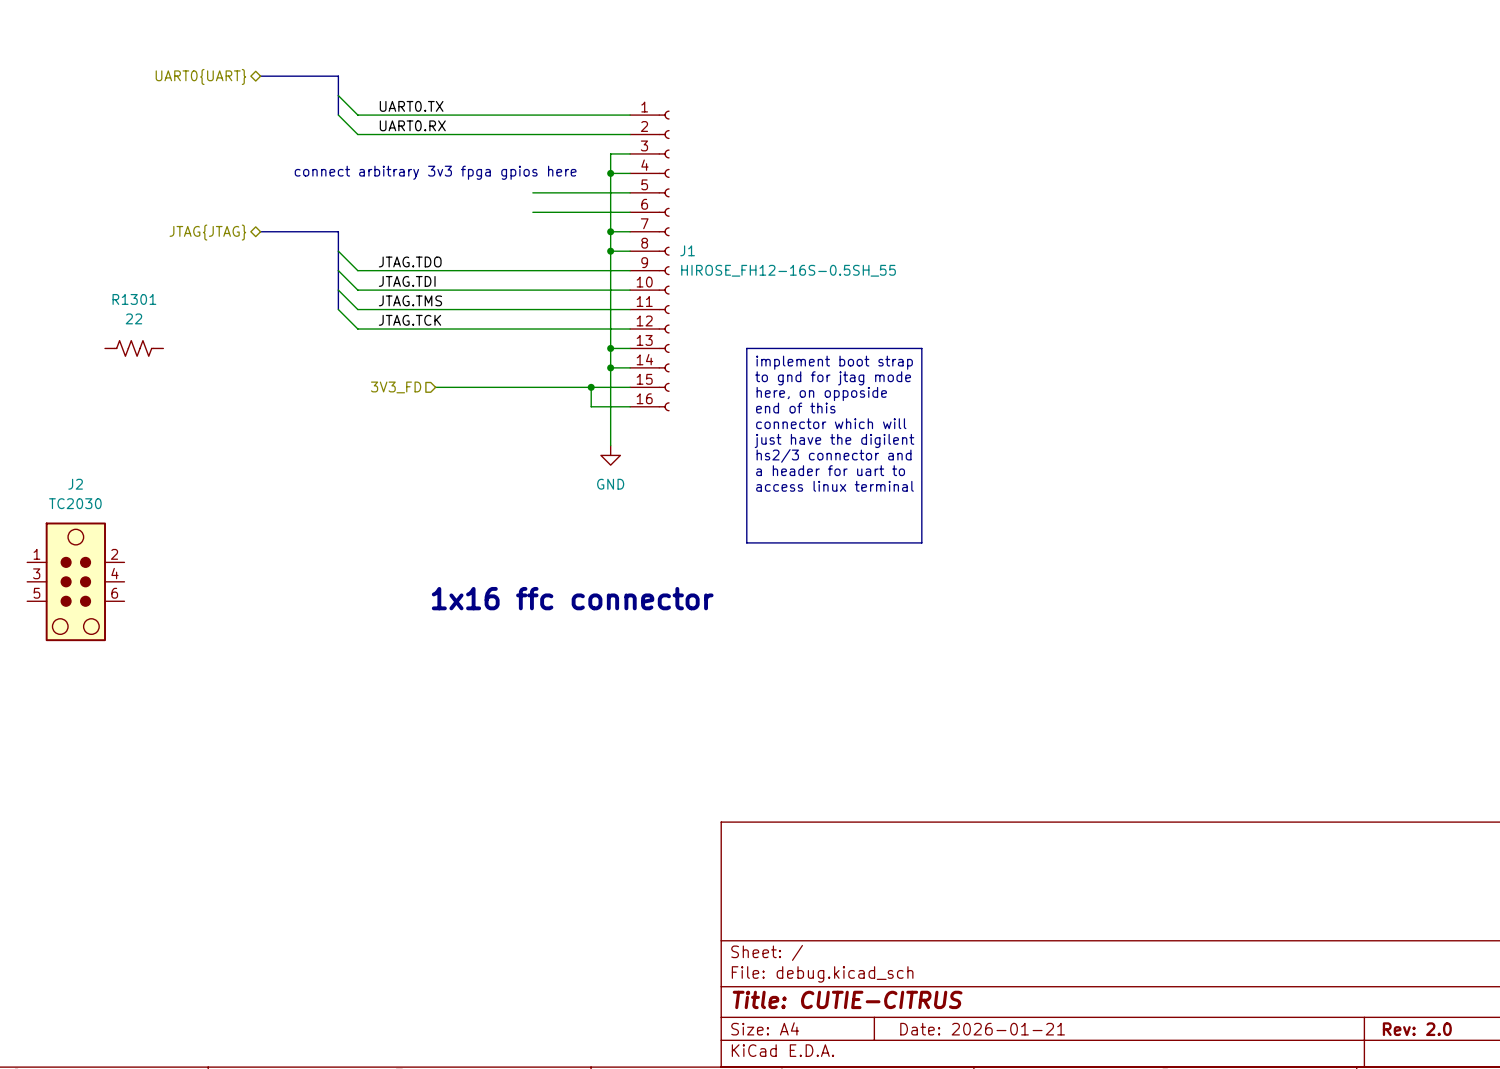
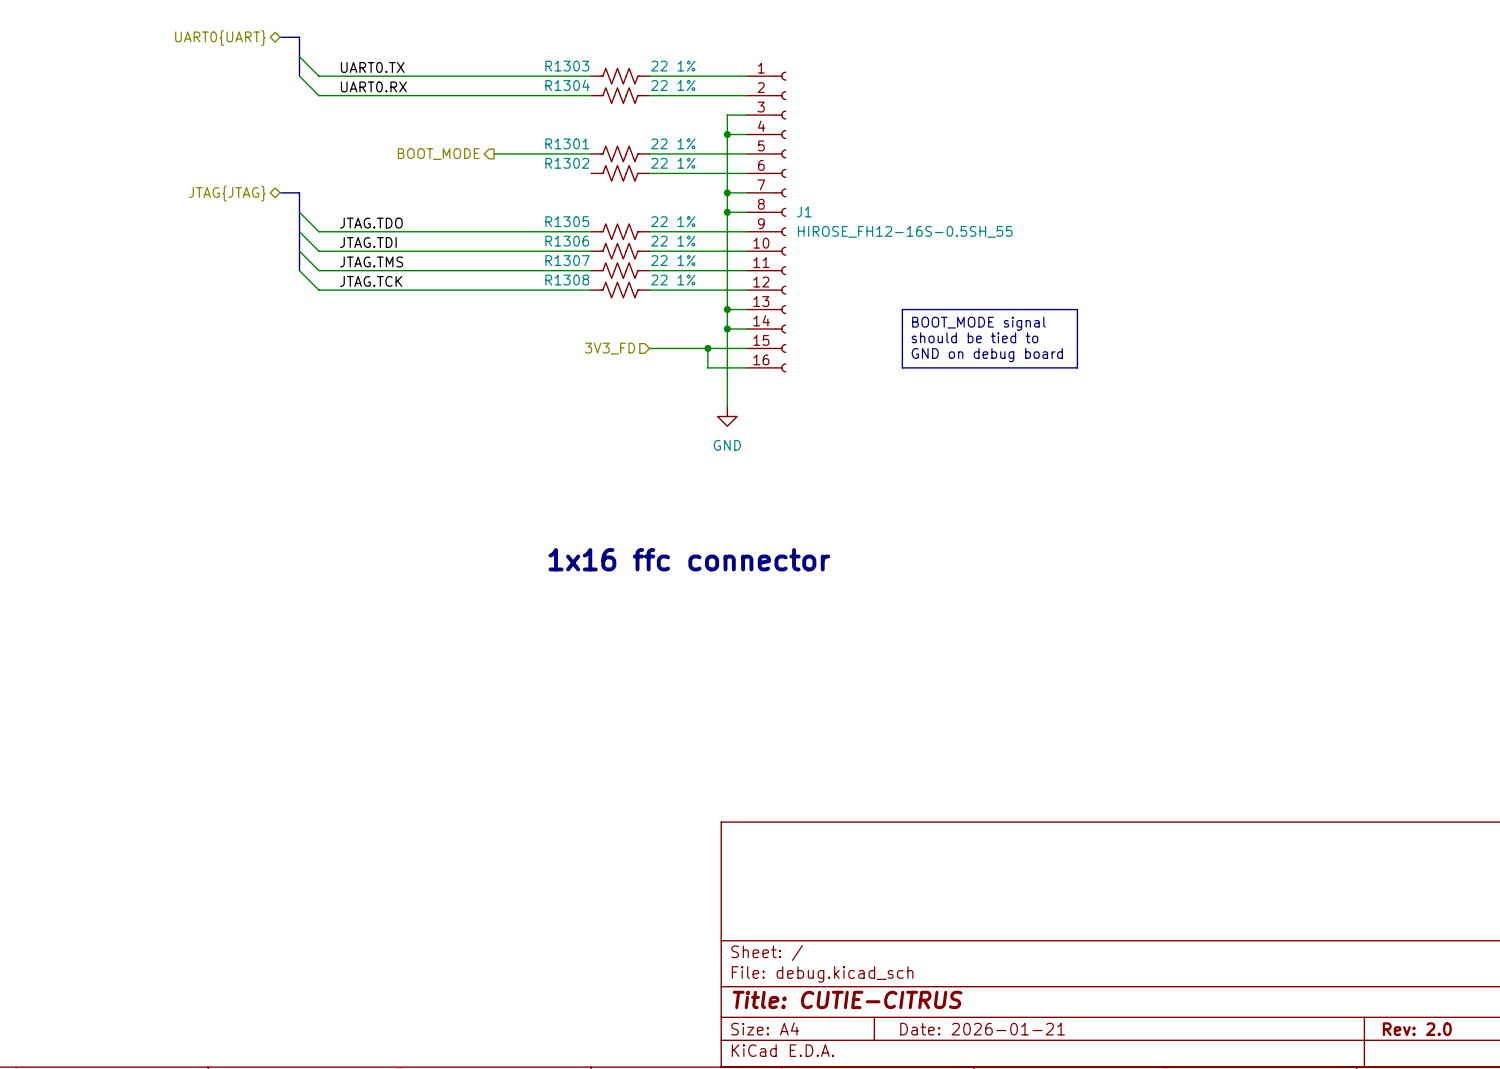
bus: none -> (280, 37) (299, 37) (299, 76)
hierarchical label position: UART0{UART} (200, 76) -> UART0{UART} (220, 38)
bus: (260, 76) (338, 76) (338, 115) -> none
R1303: none -> 22 1% (620, 76)
wire: none -> (649, 76) (746, 76)
wire: (338, 95) (357, 115) (630, 115) -> (299, 56) (318, 76) (591, 76)
R1304: none -> 22 1% (620, 95)
wire: none -> (649, 95) (746, 95)
label position: UART0.TX (411, 106) -> UART0.TX (372, 67)
wire: (338, 115) (357, 134) (630, 134) -> (299, 76) (318, 95) (591, 95)
label position: UART0.RX (412, 125) -> UART0.RX (373, 86)
junction: none -> (727, 134)
wire: none -> (493, 153) (591, 153)
wire: (630, 153) (610, 153) (610, 445) -> (746, 115) (727, 115) (727, 406)
hierarchical label: none -> BOOT_MODE (438, 154)
text: connect arbitrary 3v3 fpga gpios here (435, 172) -> none
wire: (610, 173) (630, 173) -> (727, 134) (746, 134)
junction: (610, 173) -> none
R1302: none -> 22 1% (620, 173)
bus: none -> (280, 192) (299, 192) (299, 270)
wire: (532, 192) (630, 192) -> (649, 153) (746, 153)
junction: none -> (727, 192)
wire: (532, 212) (630, 212) -> (649, 173) (746, 173)
junction: none -> (727, 212)
bus: (260, 231) (338, 231) (338, 309) -> none
wire: (610, 231) (630, 231) -> (727, 192) (746, 192)
junction: (610, 231) -> none
R1305: none -> 22 1% (620, 231)
wire: none -> (649, 231) (746, 231)
hierarchical label position: JTAG{JTAG} (207, 232) -> JTAG{JTAG} (227, 193)
wire: (338, 251) (357, 270) -> (299, 251) (318, 270) (357, 270)
wire: (610, 251) (630, 251) -> (727, 212) (746, 212)
junction: (610, 251) -> none
R1306: none -> 22 1% (620, 251)
wire: none -> (649, 251) (746, 251)
J1 position: (649, 260) -> (766, 222)
label position: JTAG.TDO (410, 261) -> JTAG.TDO (371, 223)
wire: (338, 270) (357, 290) -> (299, 270) (318, 290) (357, 290)
wire: (591, 270) (630, 270) -> none
R1307: none -> 22 1% (620, 270)
wire: none -> (649, 270) (746, 270)
label position: JTAG.TDI (407, 281) -> JTAG.TDI (368, 242)
wire: (338, 290) (357, 309) (630, 309) -> (299, 231) (318, 251) (591, 251)
wire: (591, 290) (630, 290) -> none
R1308: none -> 22 1% (620, 290)
wire: none -> (649, 290) (746, 290)
R1301 name position: R1301 (134, 299) -> R1301 (567, 143)
label position: JTAG.TMS (410, 300) -> JTAG.TMS (371, 261)
wire: (338, 309) (357, 329) (630, 329) -> (299, 212) (318, 231) (591, 231)
junction: none -> (727, 309)
line: none -> (902, 309) (1077, 309) (1077, 367) (902, 367) (902, 309)
R1301 value: 22 (133, 318) -> 22 1% (673, 143)
label position: JTAG.TCK (410, 320) -> JTAG.TCK (371, 281)
text: none -> BOOT_MODE signal (978, 323)
junction: none -> (727, 329)
text: none -> should be tied to (975, 337)
R1301 position: (134, 348) -> (620, 153)
wire: (610, 348) (630, 348) -> (727, 309) (746, 309)
junction: (610, 348) -> none
hierarchical label: none -> 3V3_FD (610, 348)
wire: none -> (649, 348) (746, 348)
junction: none -> (707, 348)
line: (746, 348) (921, 348) (921, 542) (746, 542) (746, 348) -> none
text: none -> GND on debug board (987, 355)
text: implement boot strap (834, 362) -> none
wire: (610, 367) (630, 367) -> (727, 329) (746, 329)
junction: (610, 367) -> none
text: to gnd for jtag mode (833, 378) -> none
hierarchical label: 3V3_FD (396, 387) -> none
wire: (435, 387) (630, 387) -> none
wire: (591, 387) (591, 406) (630, 406) -> (707, 348) (707, 367) (746, 367)
junction: (591, 387) -> none
text: here, on opposide (821, 394) -> none
text: end of this (795, 408) -> none
text: connector which will (831, 423) -> none
text: just have the digilent (834, 440) -> none
power symbol position: GND (610, 455) -> GND (727, 416)
text: hs2/3 connector and (834, 455) -> none
text: a header for uart to (830, 470) -> none
text: access linux terminal (834, 486) -> none
J2: TC2030 (75, 581) -> none
text position: 1x16 ffc connector (572, 598) -> 1x16 ffc connector (689, 559)

